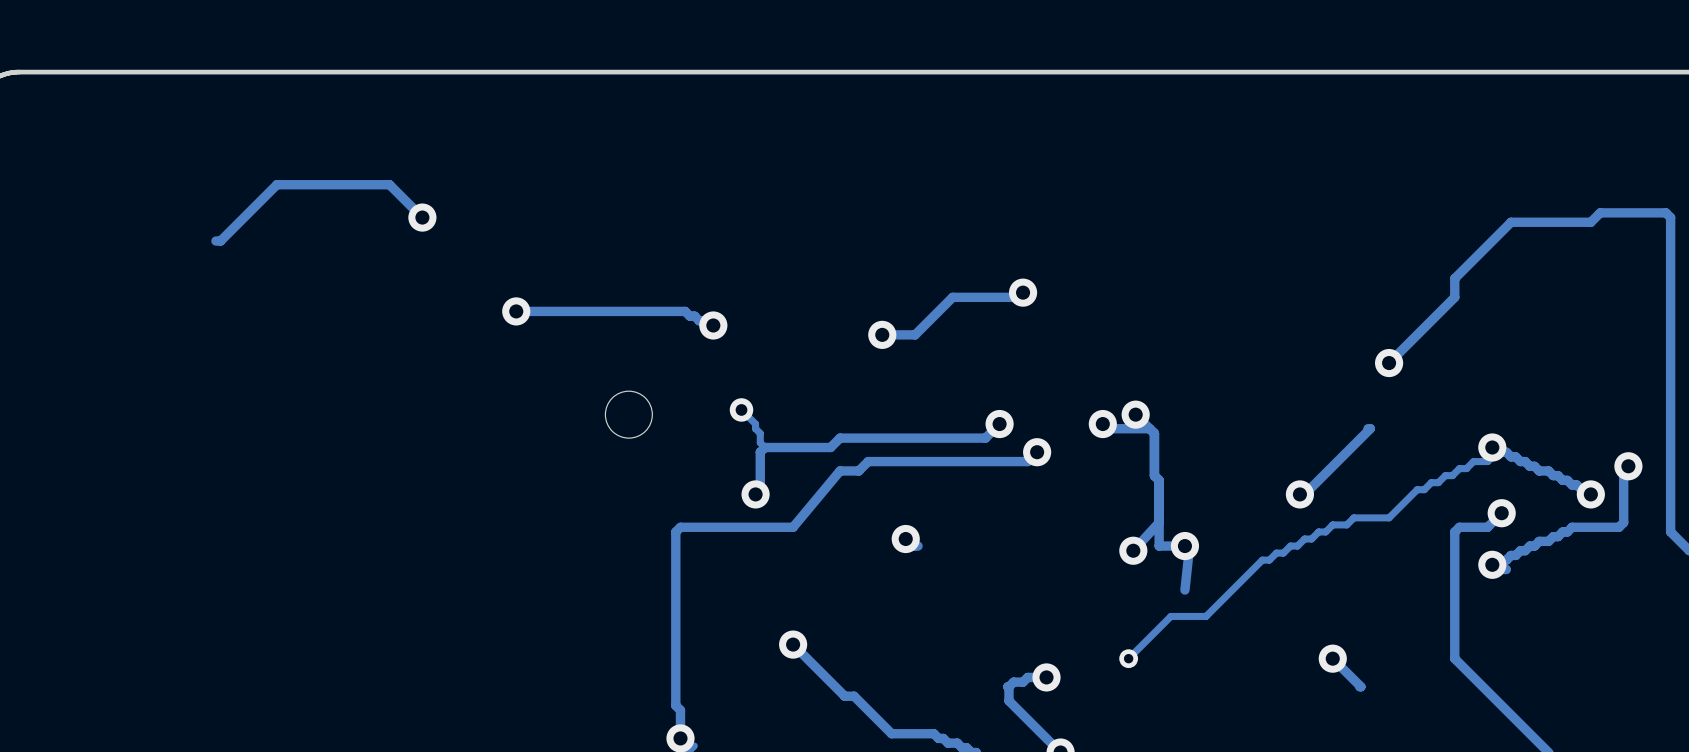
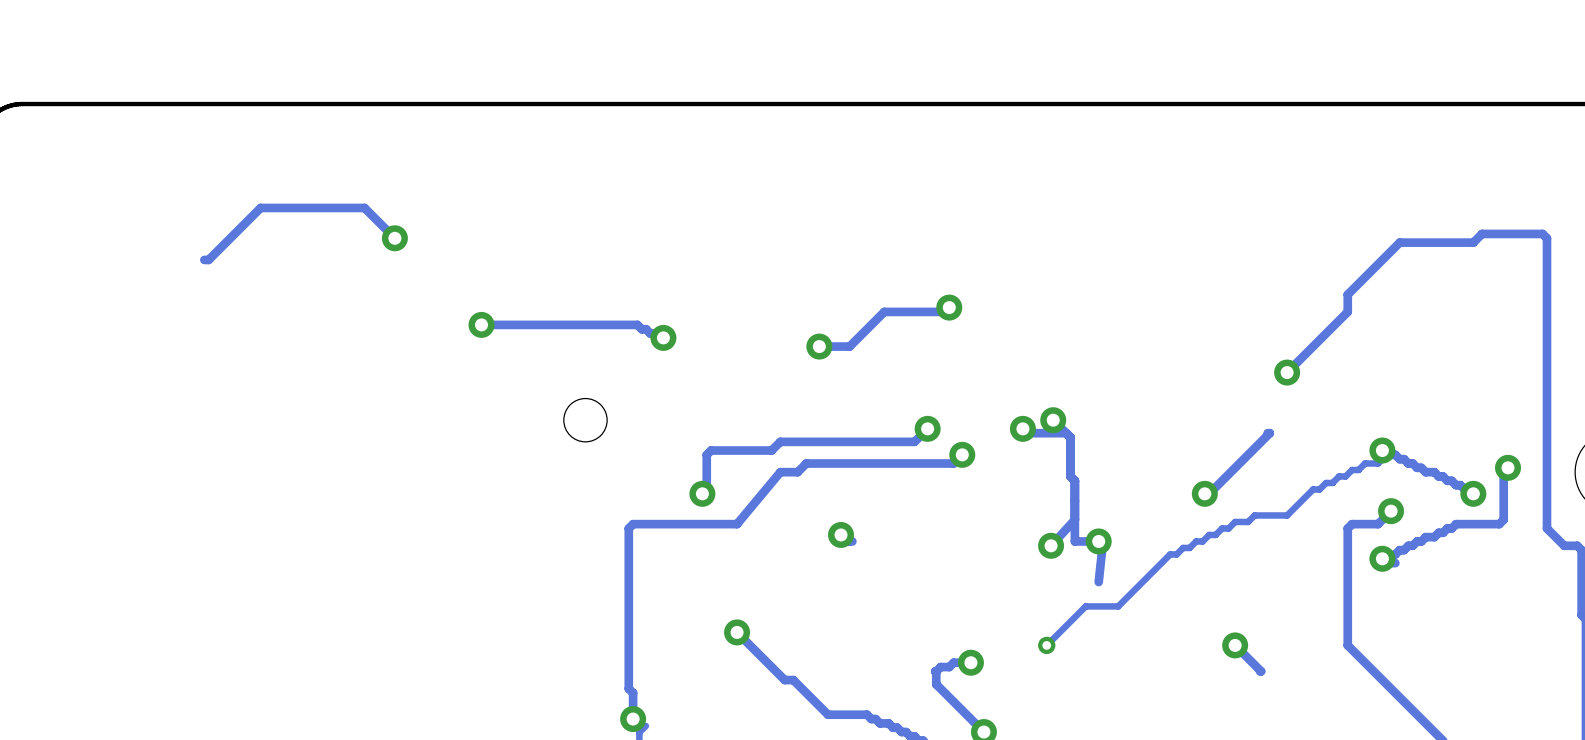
track: (741, 409) (755, 424) (755, 428) (760, 433) (760, 442) (764, 447) -> none
via: (741, 409) -> none

